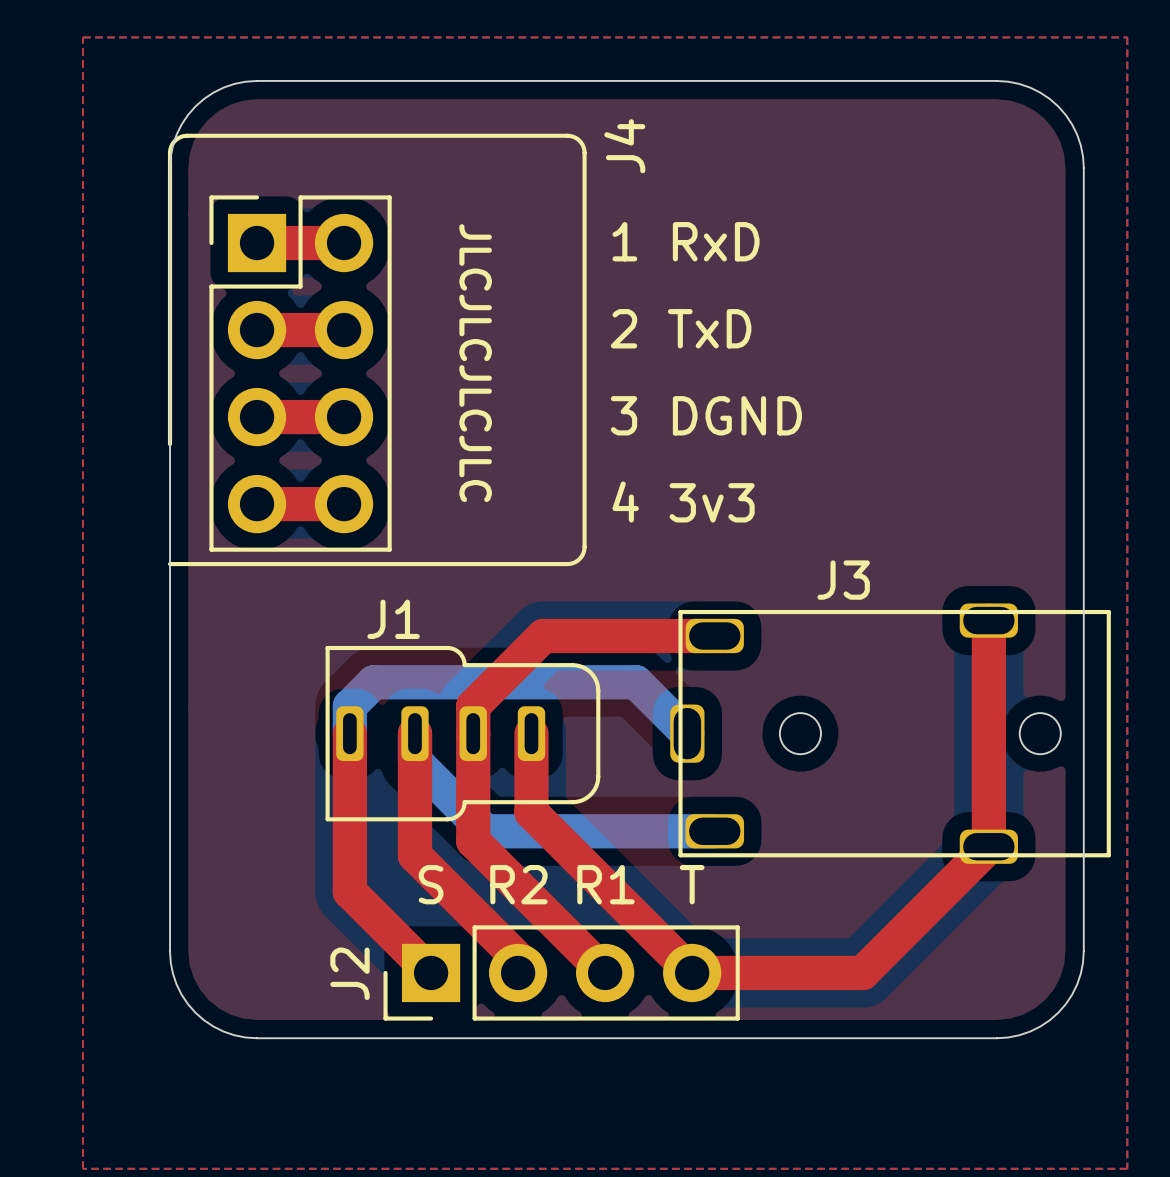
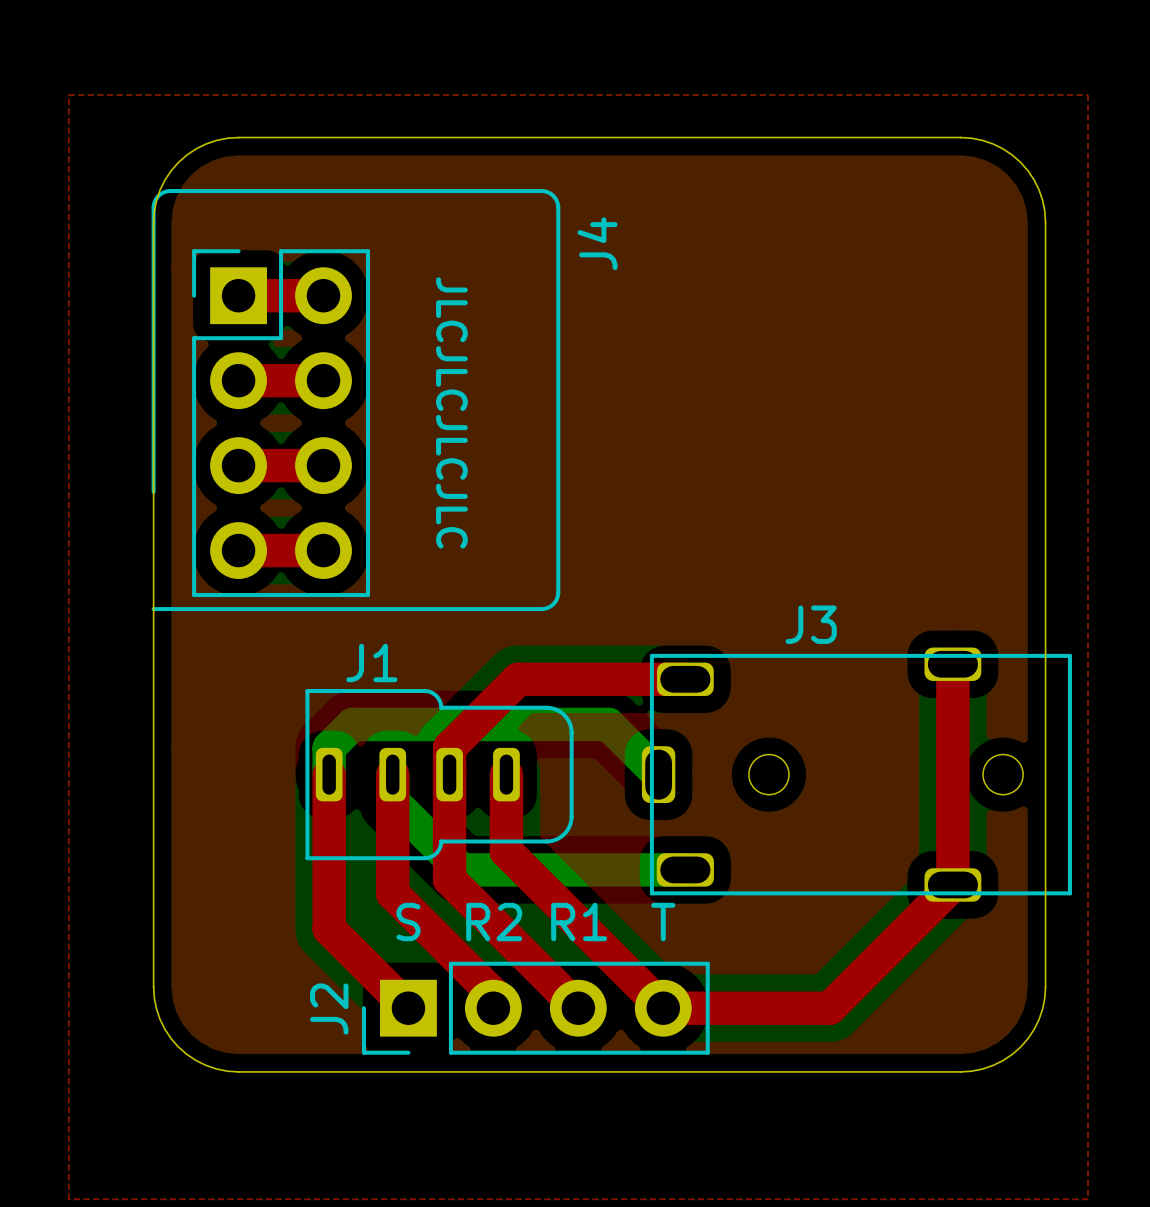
J4 name position: J4 (624, 146) -> J4 (597, 243)
text: 1 RxD (686, 241) -> none
text: 2 TxD (681, 328) -> none
text: 3 DGND (706, 415) -> none
text: 4 3v3 (683, 502) -> none

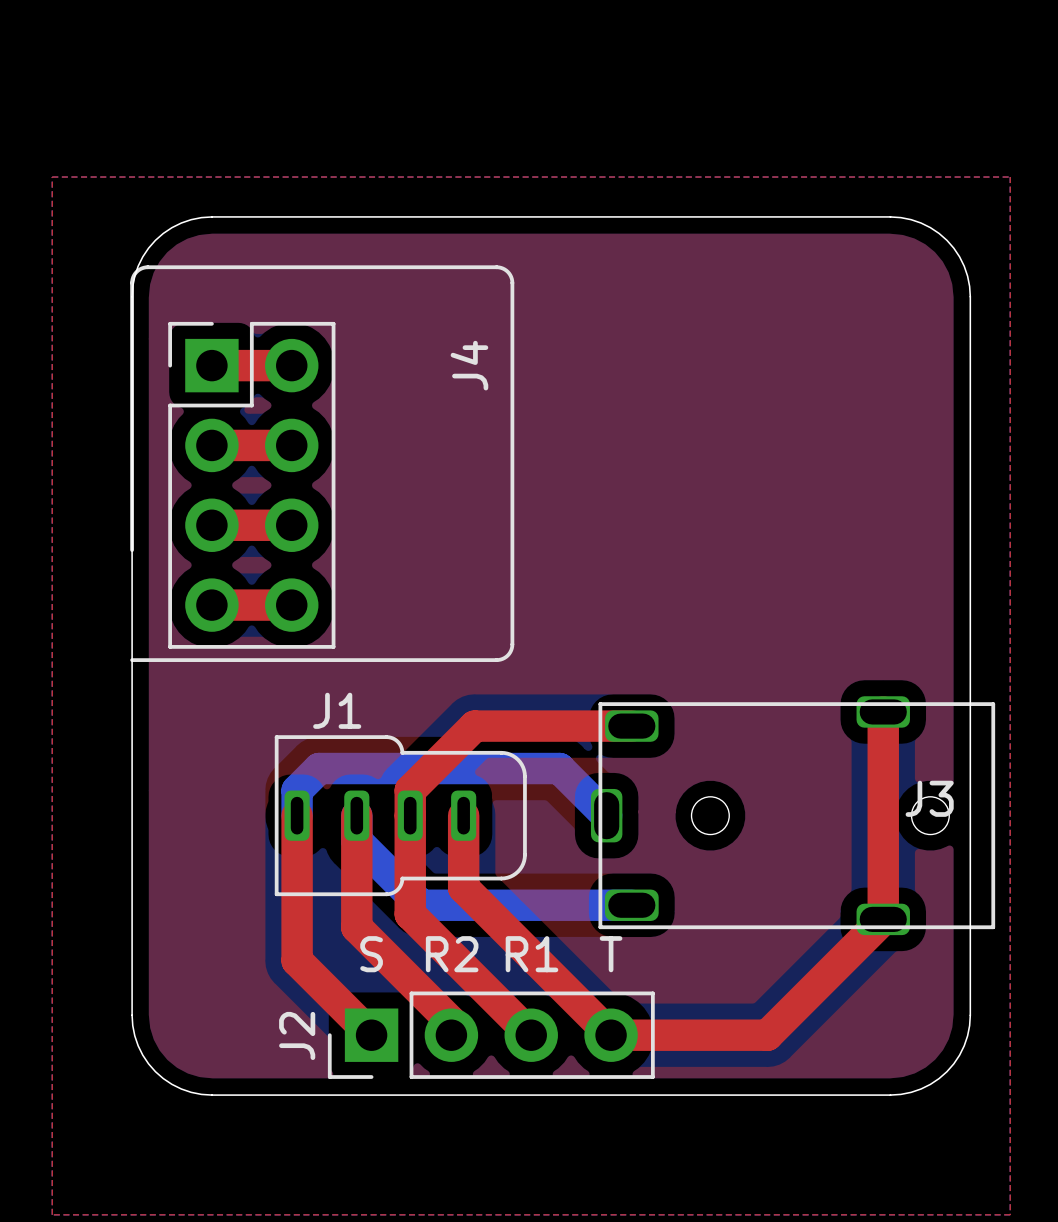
J4 name position: J4 (597, 243) -> J4 (469, 365)
text: JLCJLCJLCJLC (451, 412) -> none
J3 name position: J3 (811, 624) -> J3 (929, 798)

